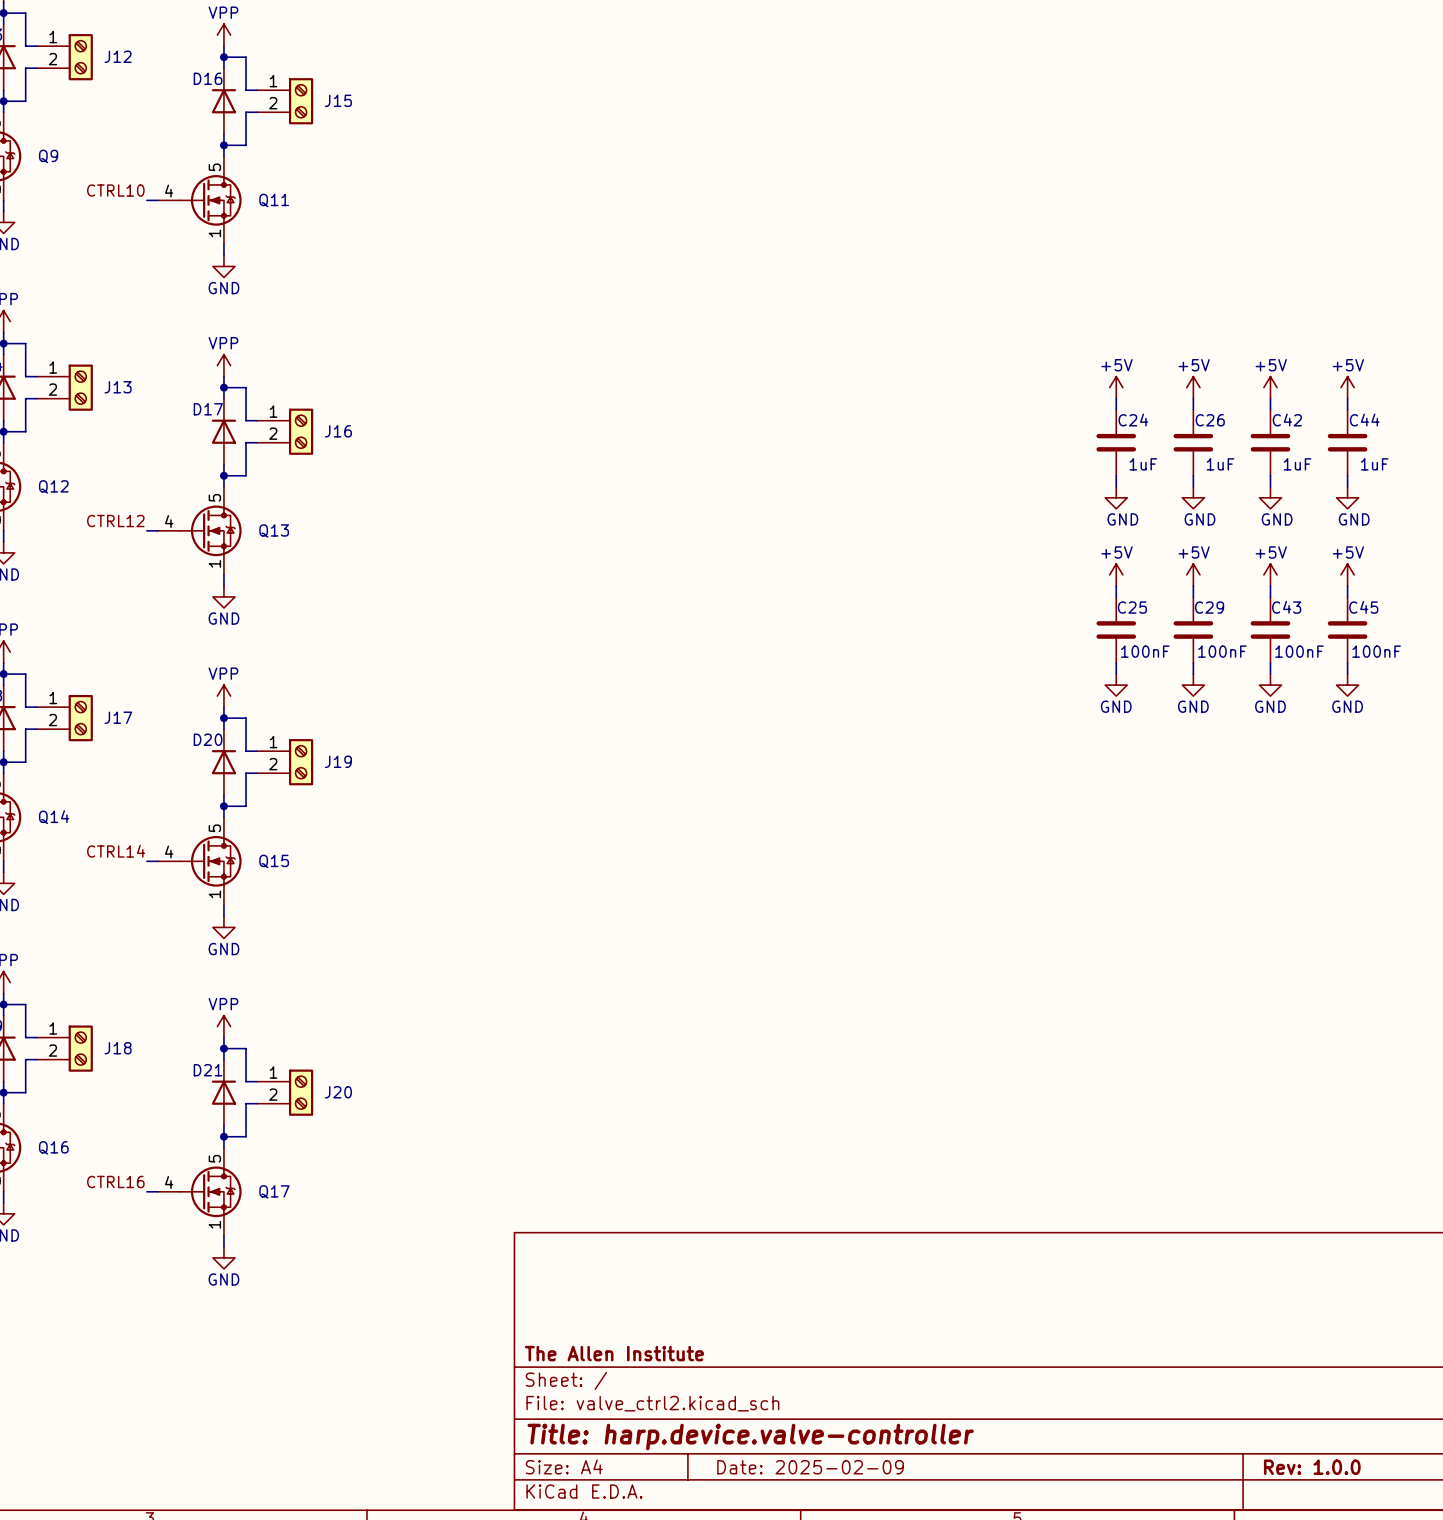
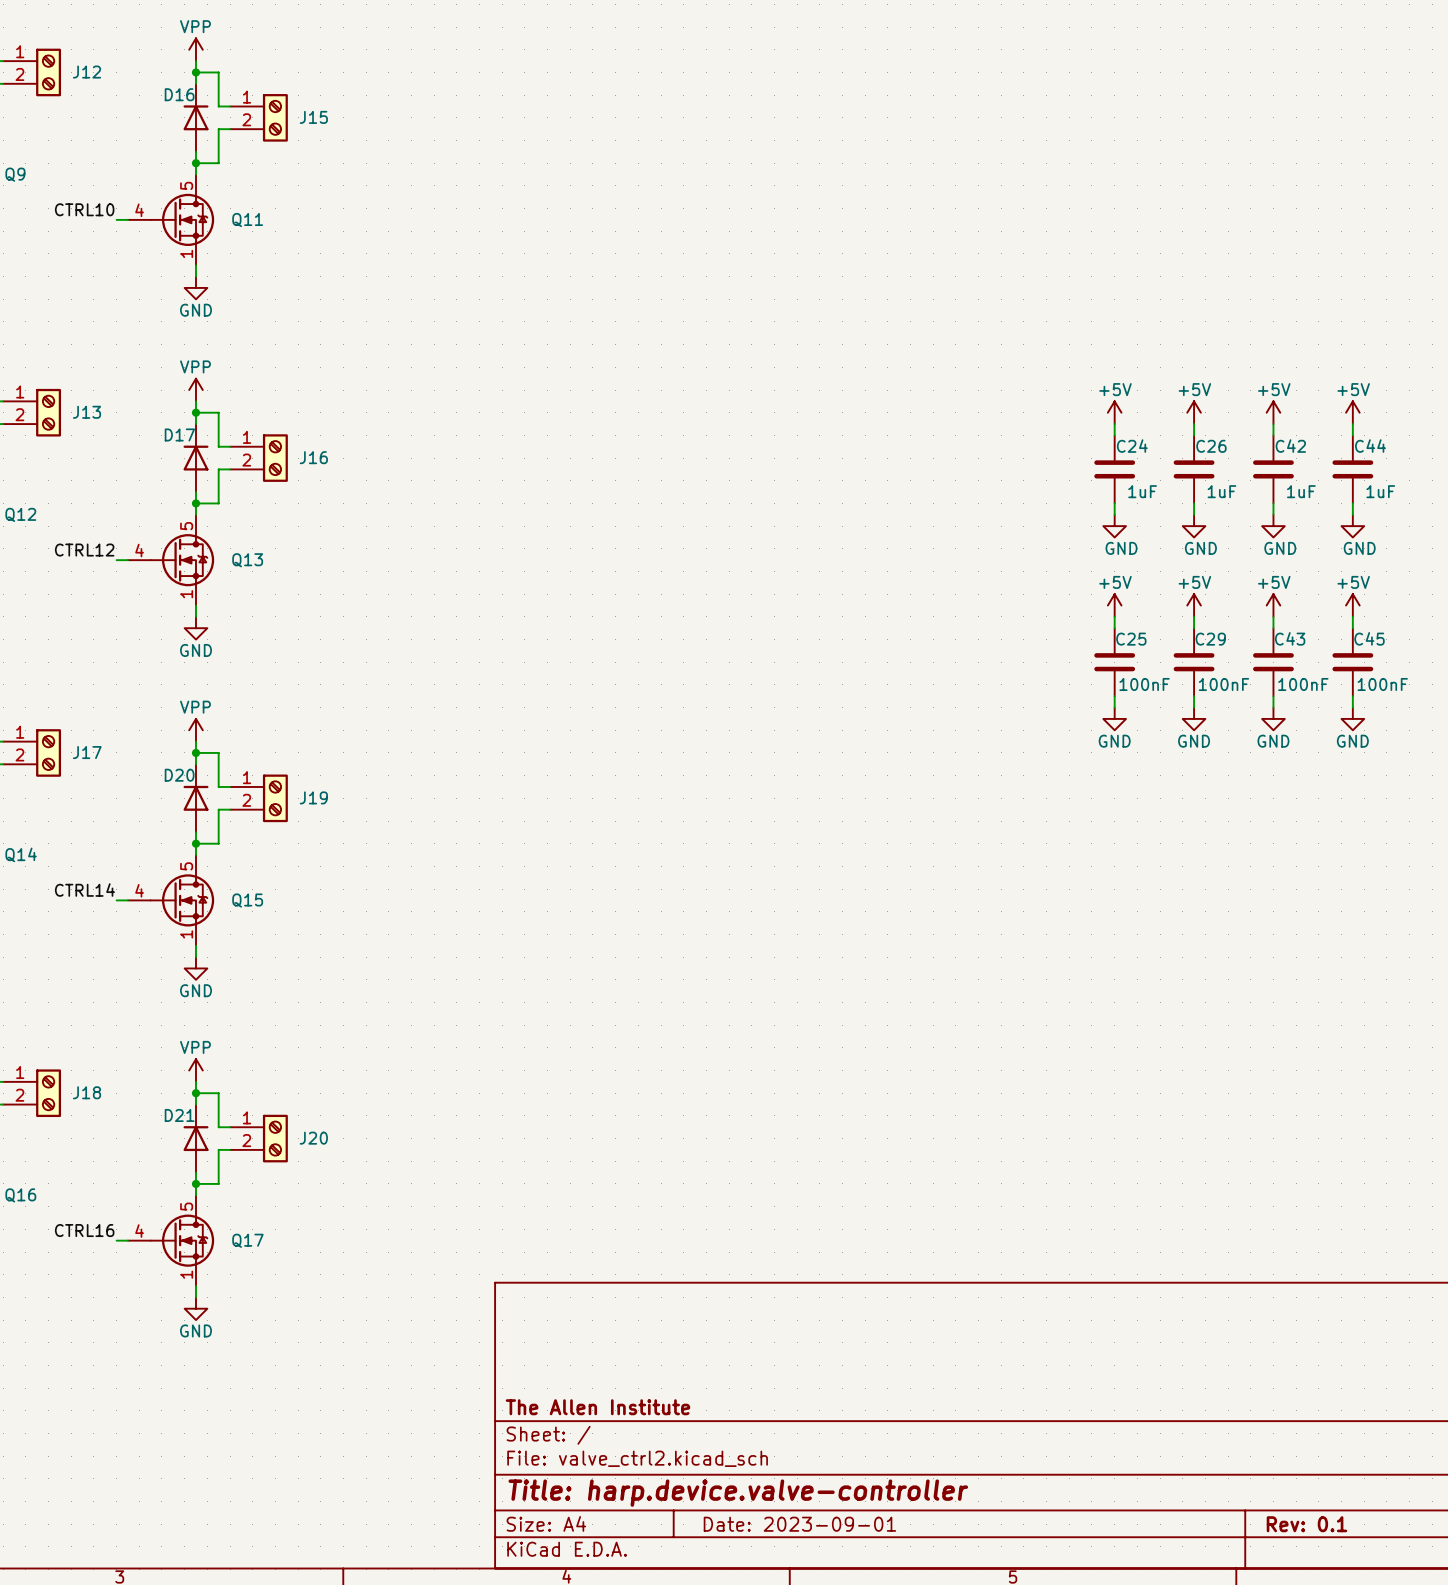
title block: Date: 2025-02-09 (810, 1467) -> Date: 2023-09-01 (799, 1524)
title block: Rev: 1.0.0 (1312, 1467) -> Rev: 0.1 (1306, 1524)

